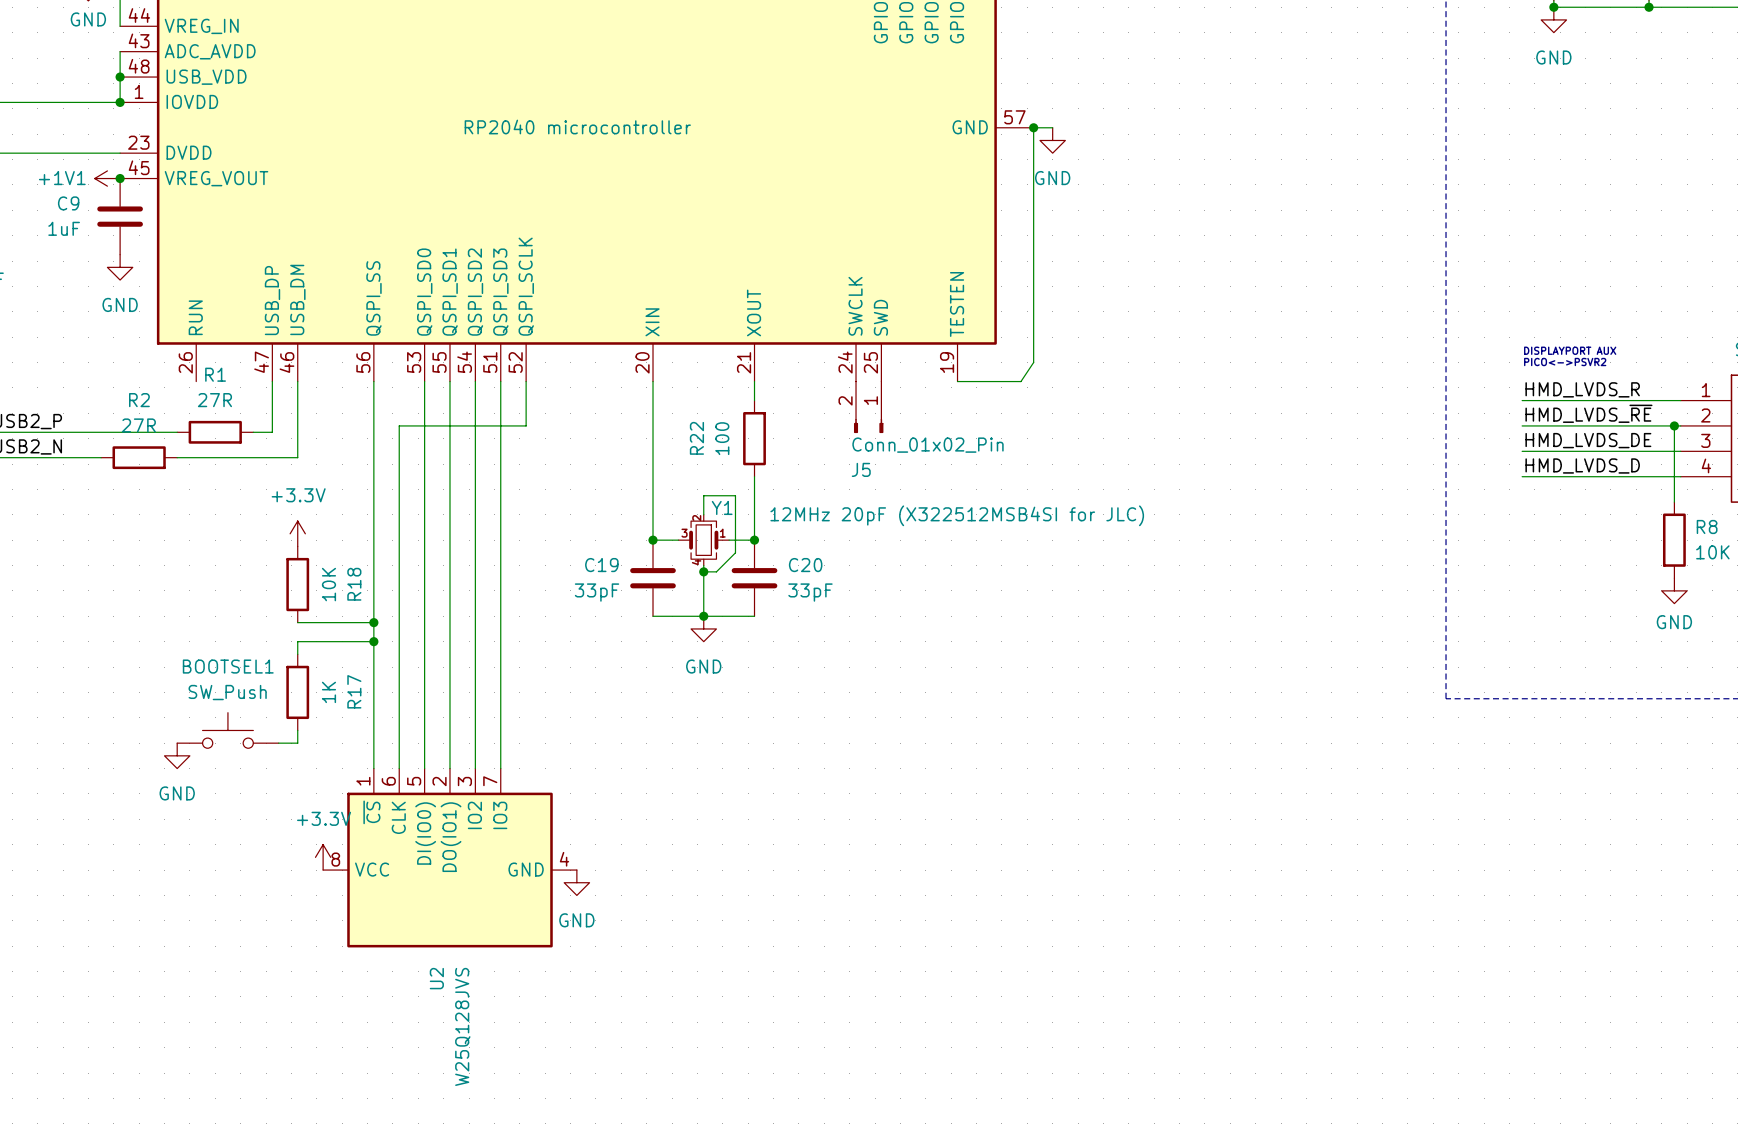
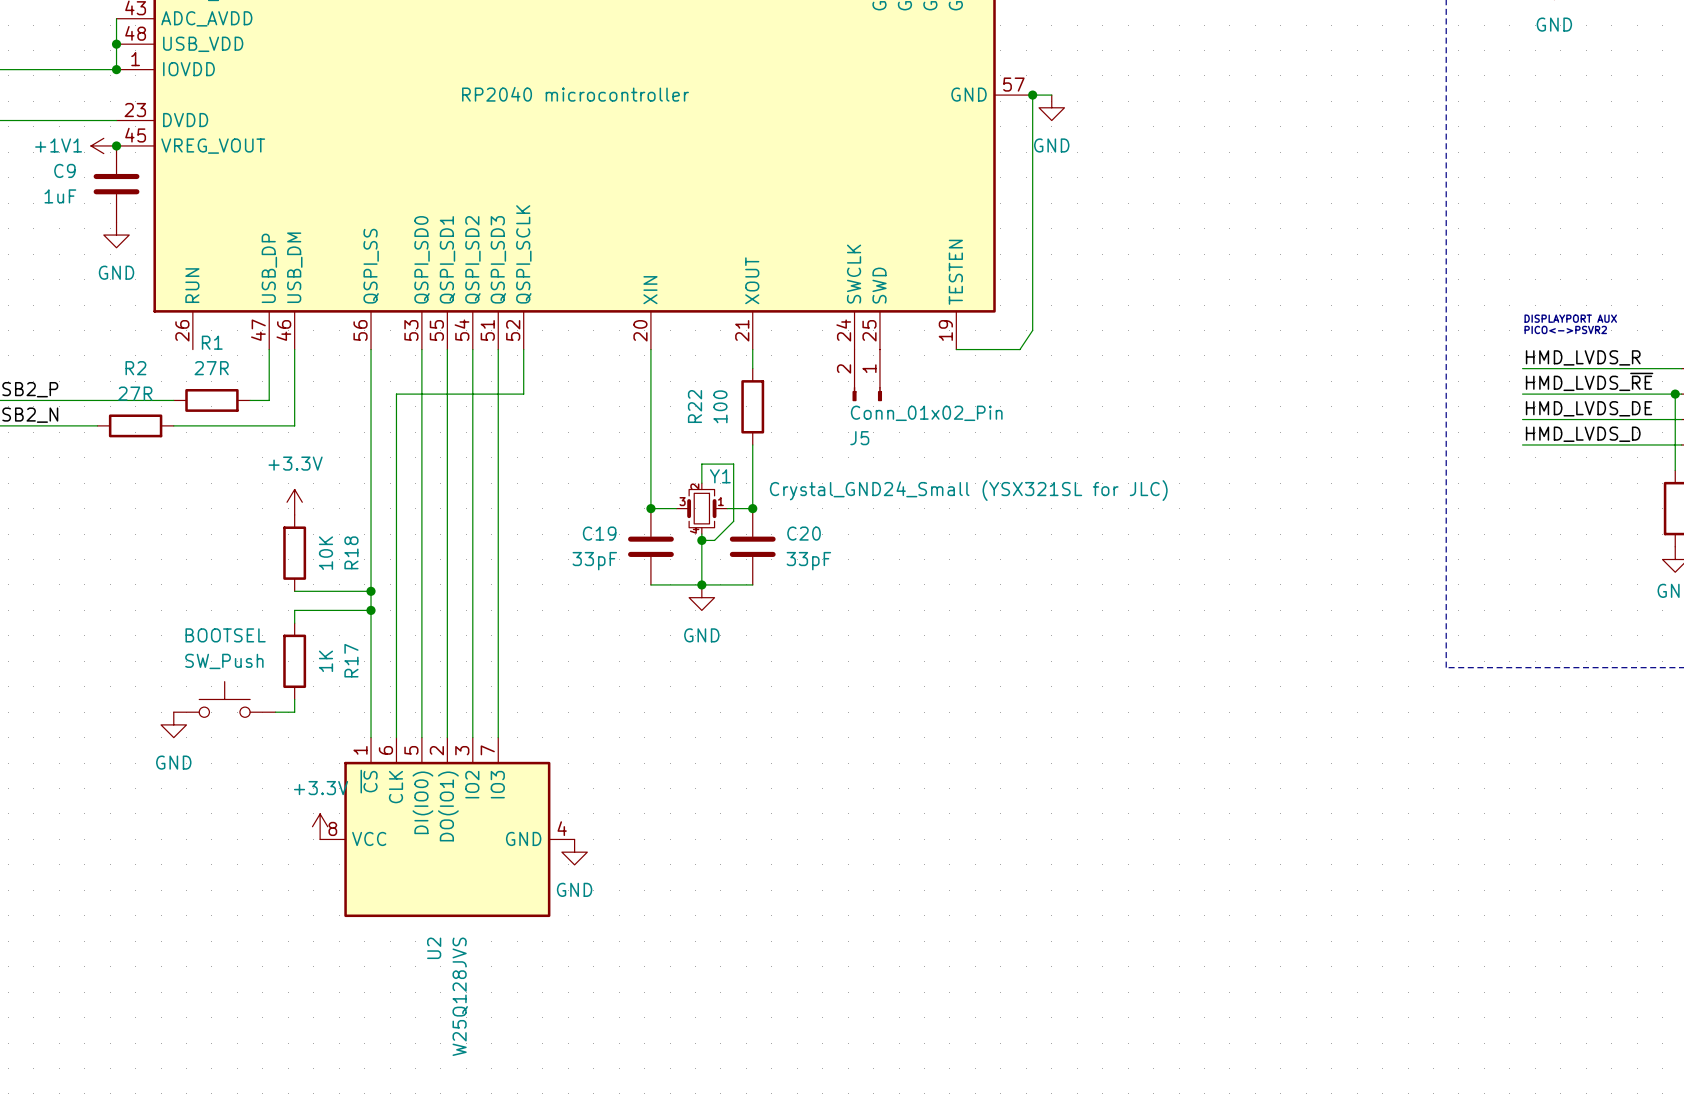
Y1 value: 12MHz 20pF (X322512MSB4SI for JLC) (957, 515) -> Crystal_GND24_Small (YSX321SL for JLC) (968, 490)
BOOTSEL1 name: BOOTSEL1 (228, 666) -> BOOTSEL (225, 635)

